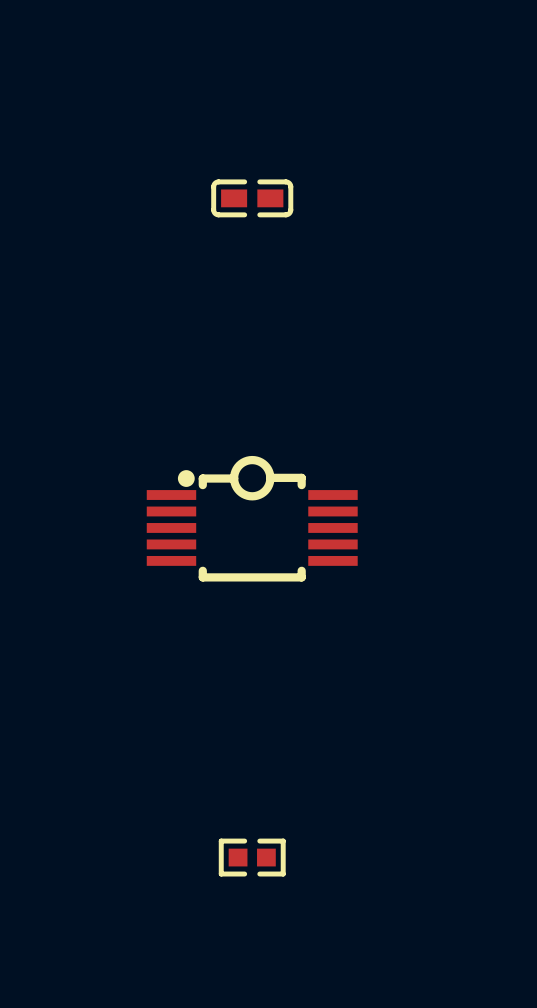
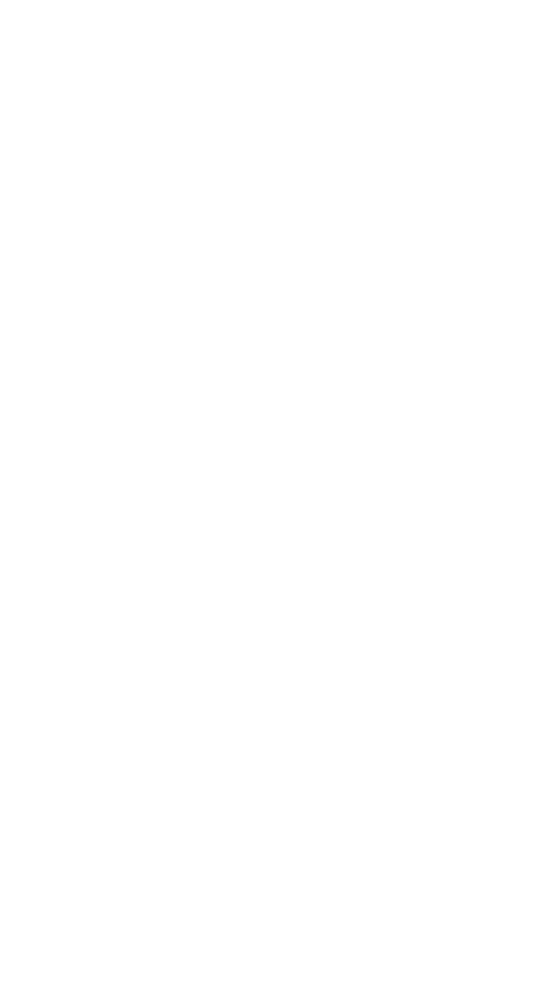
part: (252, 198) -> none
part: (252, 518) -> none
part: (252, 857) -> none

